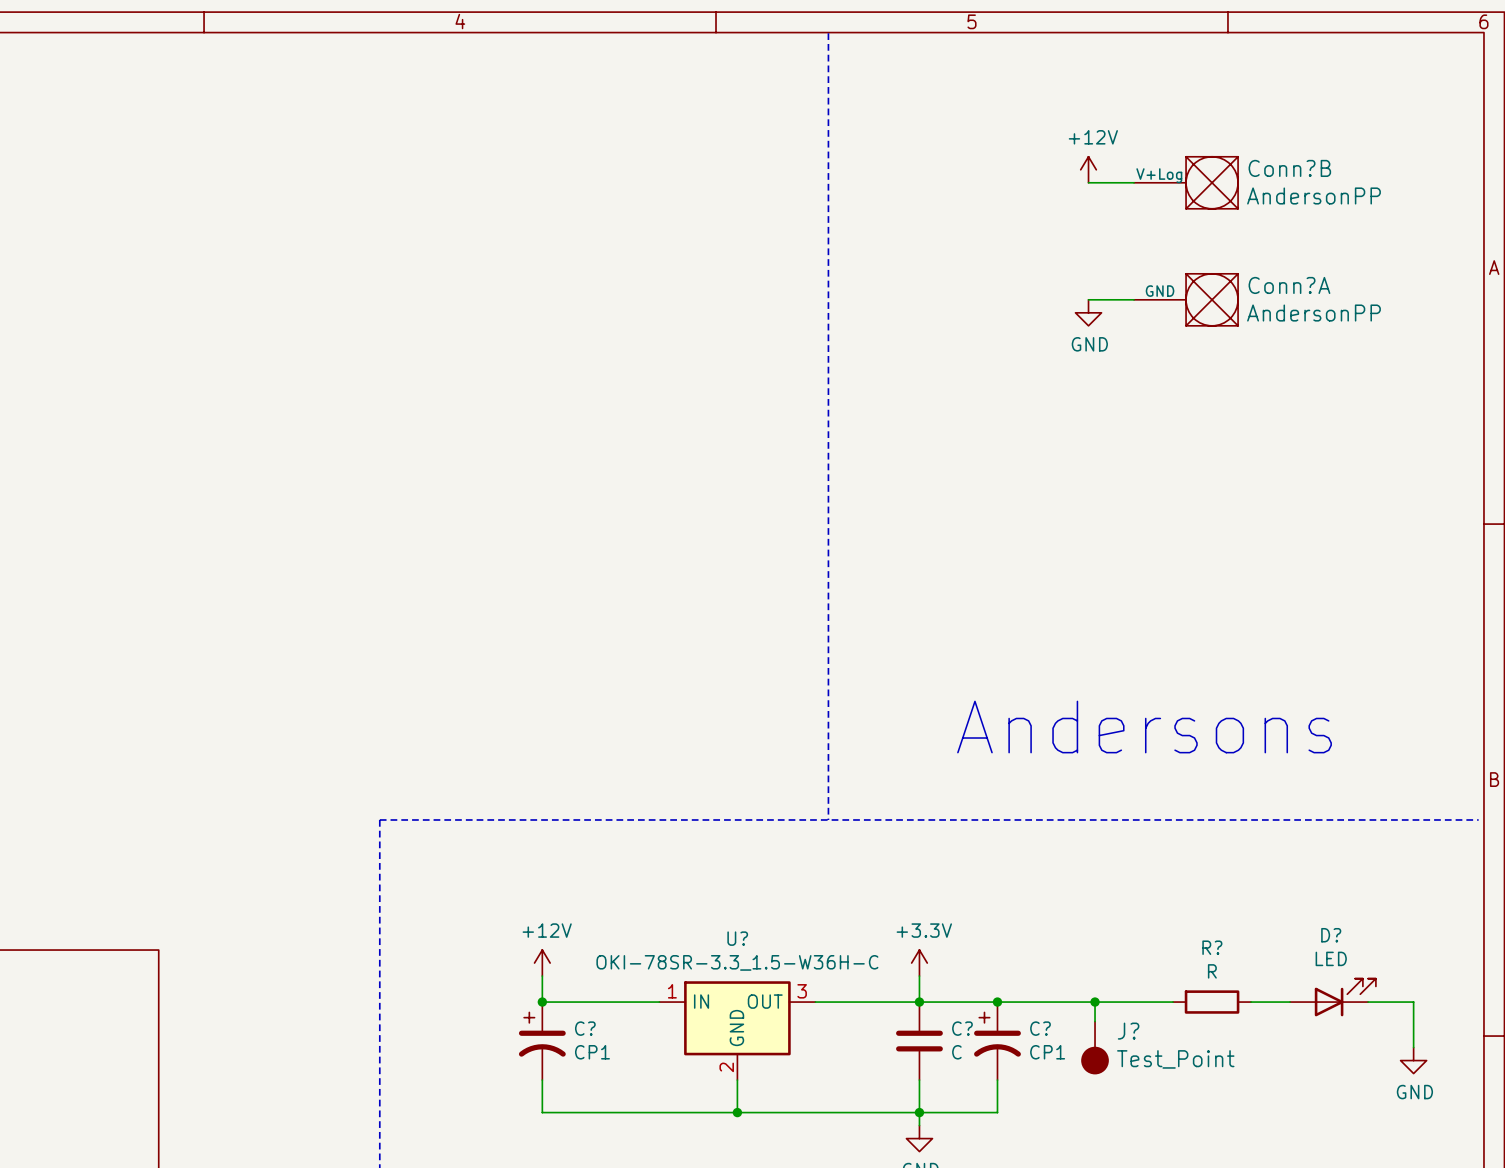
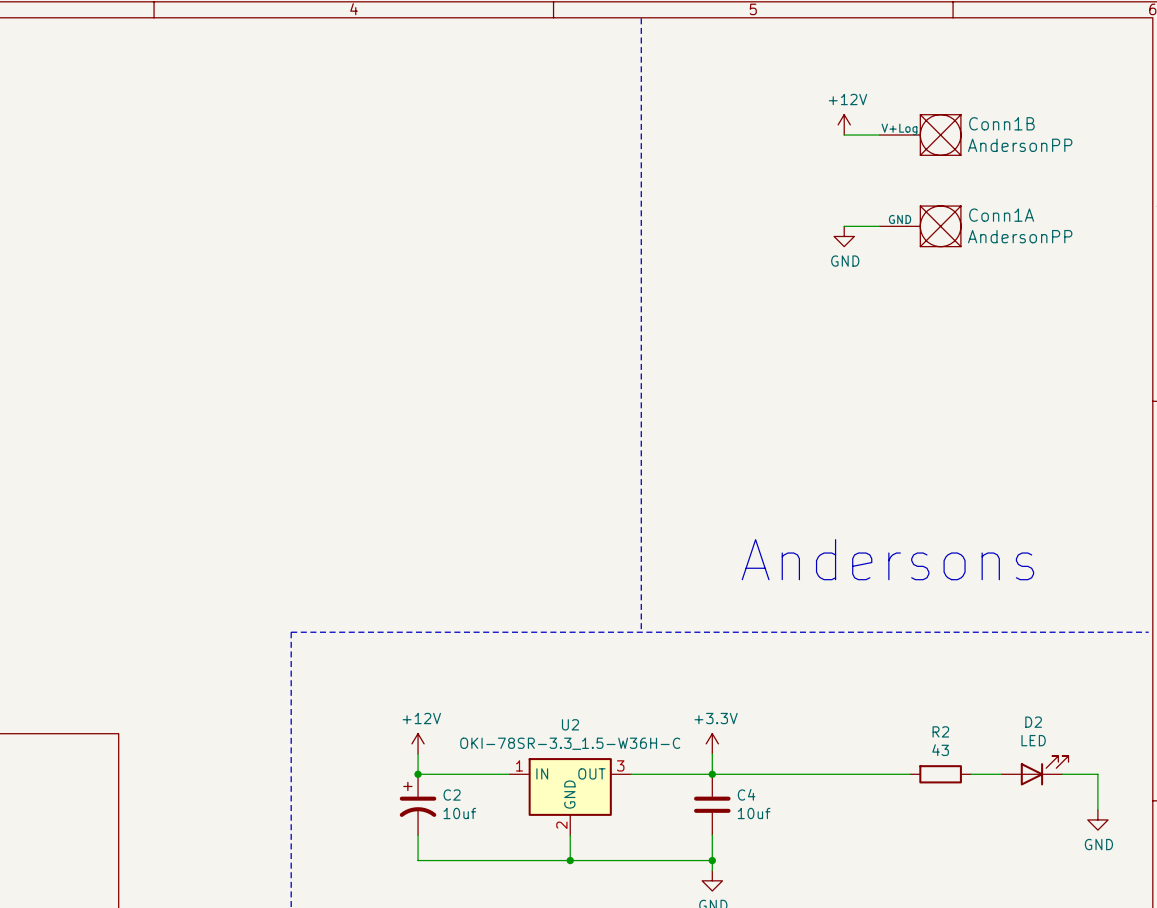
Conn?B name: Conn?B (1289, 168) -> Conn1B (1001, 123)
Conn?A name: Conn?A (1289, 285) -> Conn1A (1001, 215)
D? name: D? (1331, 935) -> D2 (1033, 722)
U? name: U? (737, 938) -> U2 (570, 724)
R? name: R? (1212, 947) -> R2 (940, 731)
R? value: R (1212, 971) -> 43 (940, 750)
junction: (997, 1002) -> none
wire: (1095, 1002) (1095, 1021) -> none
junction: (1095, 1002) -> none
C? name: C? (585, 1028) -> C2 (452, 795)
C? name: C? (962, 1028) -> C4 (746, 794)
C?: CP1 (997, 1041) -> none
J?: Test_Point (1095, 1047) -> none
C? value: CP1 (592, 1052) -> 10uf (459, 813)
C? value: C (956, 1052) -> 10uf (754, 813)
wire: (997, 1080) (997, 1112) (919, 1112) -> none

